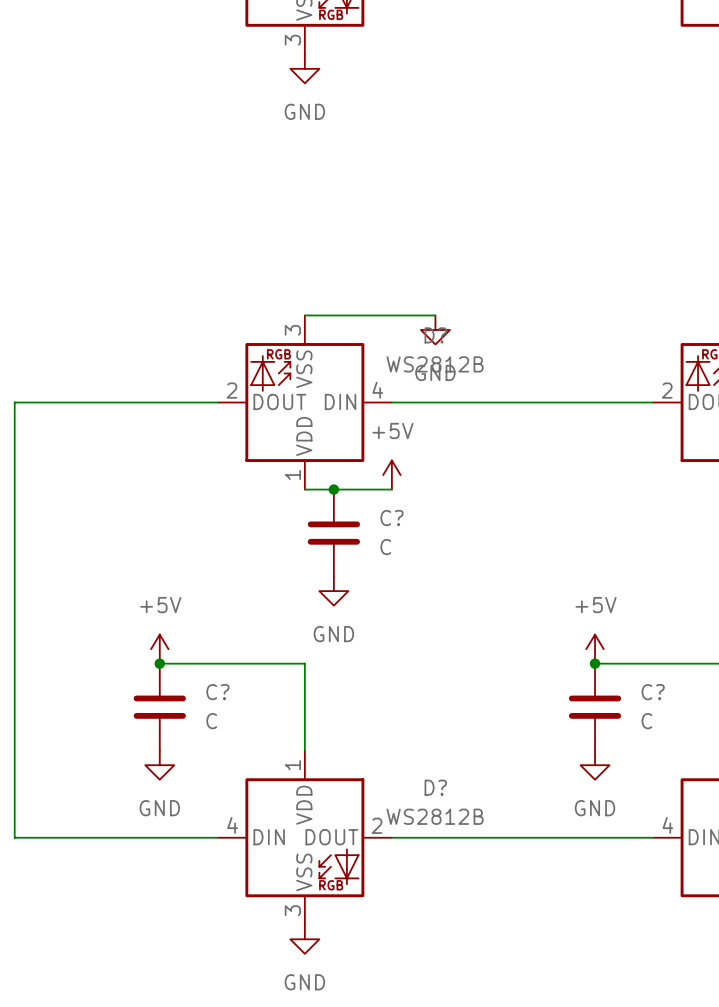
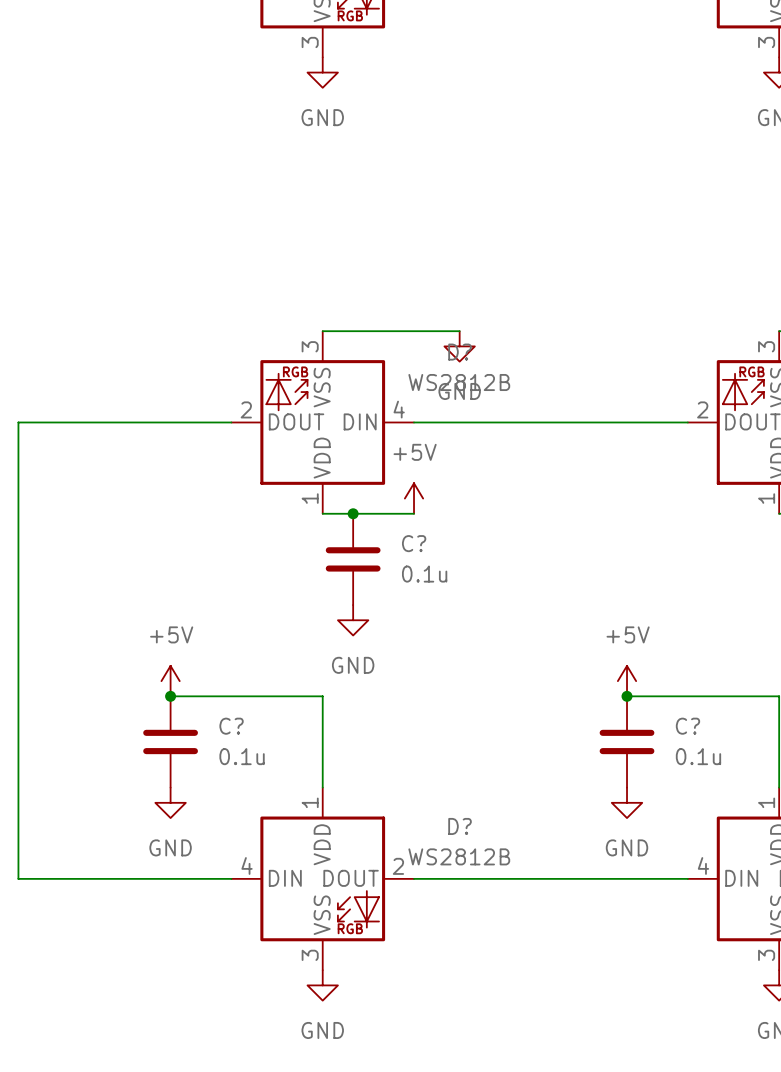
C? value: C (385, 547) -> 0.1u (424, 574)
C? value: C (211, 721) -> 0.1u (242, 756)
C? value: C (646, 721) -> 0.1u (698, 756)

